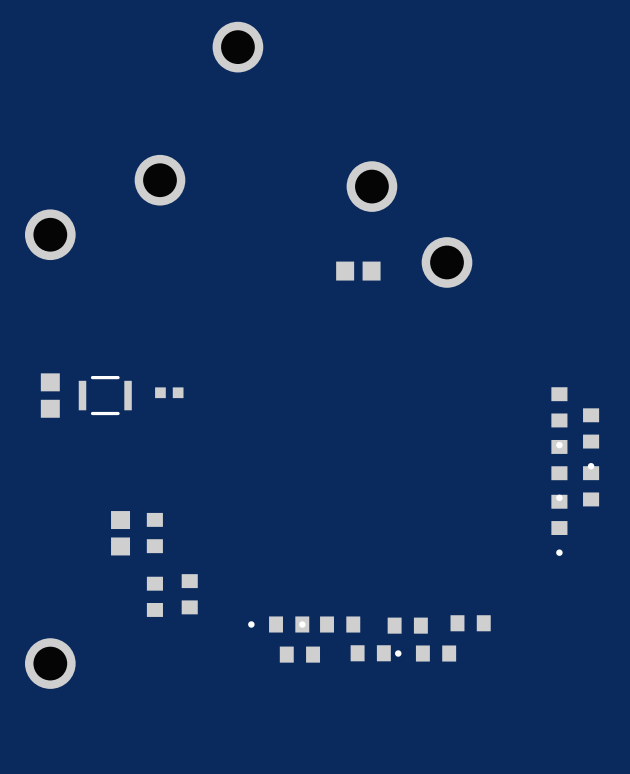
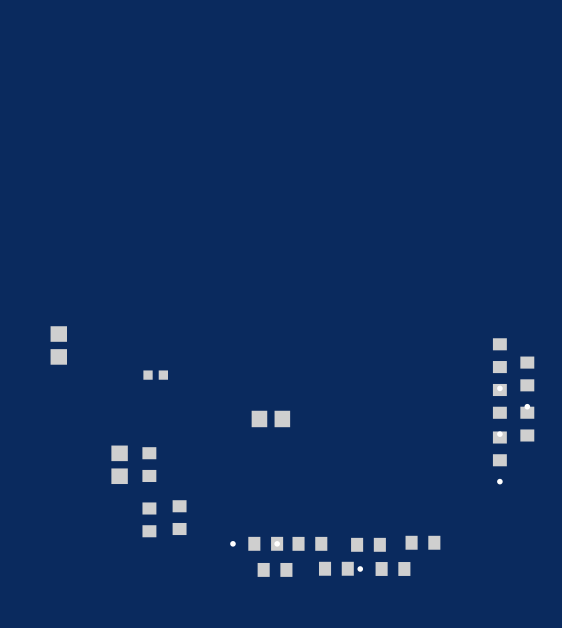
part: (237, 47) -> none
part: (160, 180) -> none
part: (371, 186) -> none
part: (50, 234) -> none
part: (447, 262) -> none
part position: (358, 271) -> (270, 418)
part position: (169, 392) -> (155, 375)
part: (105, 395) -> none
part: (50, 663) -> none

